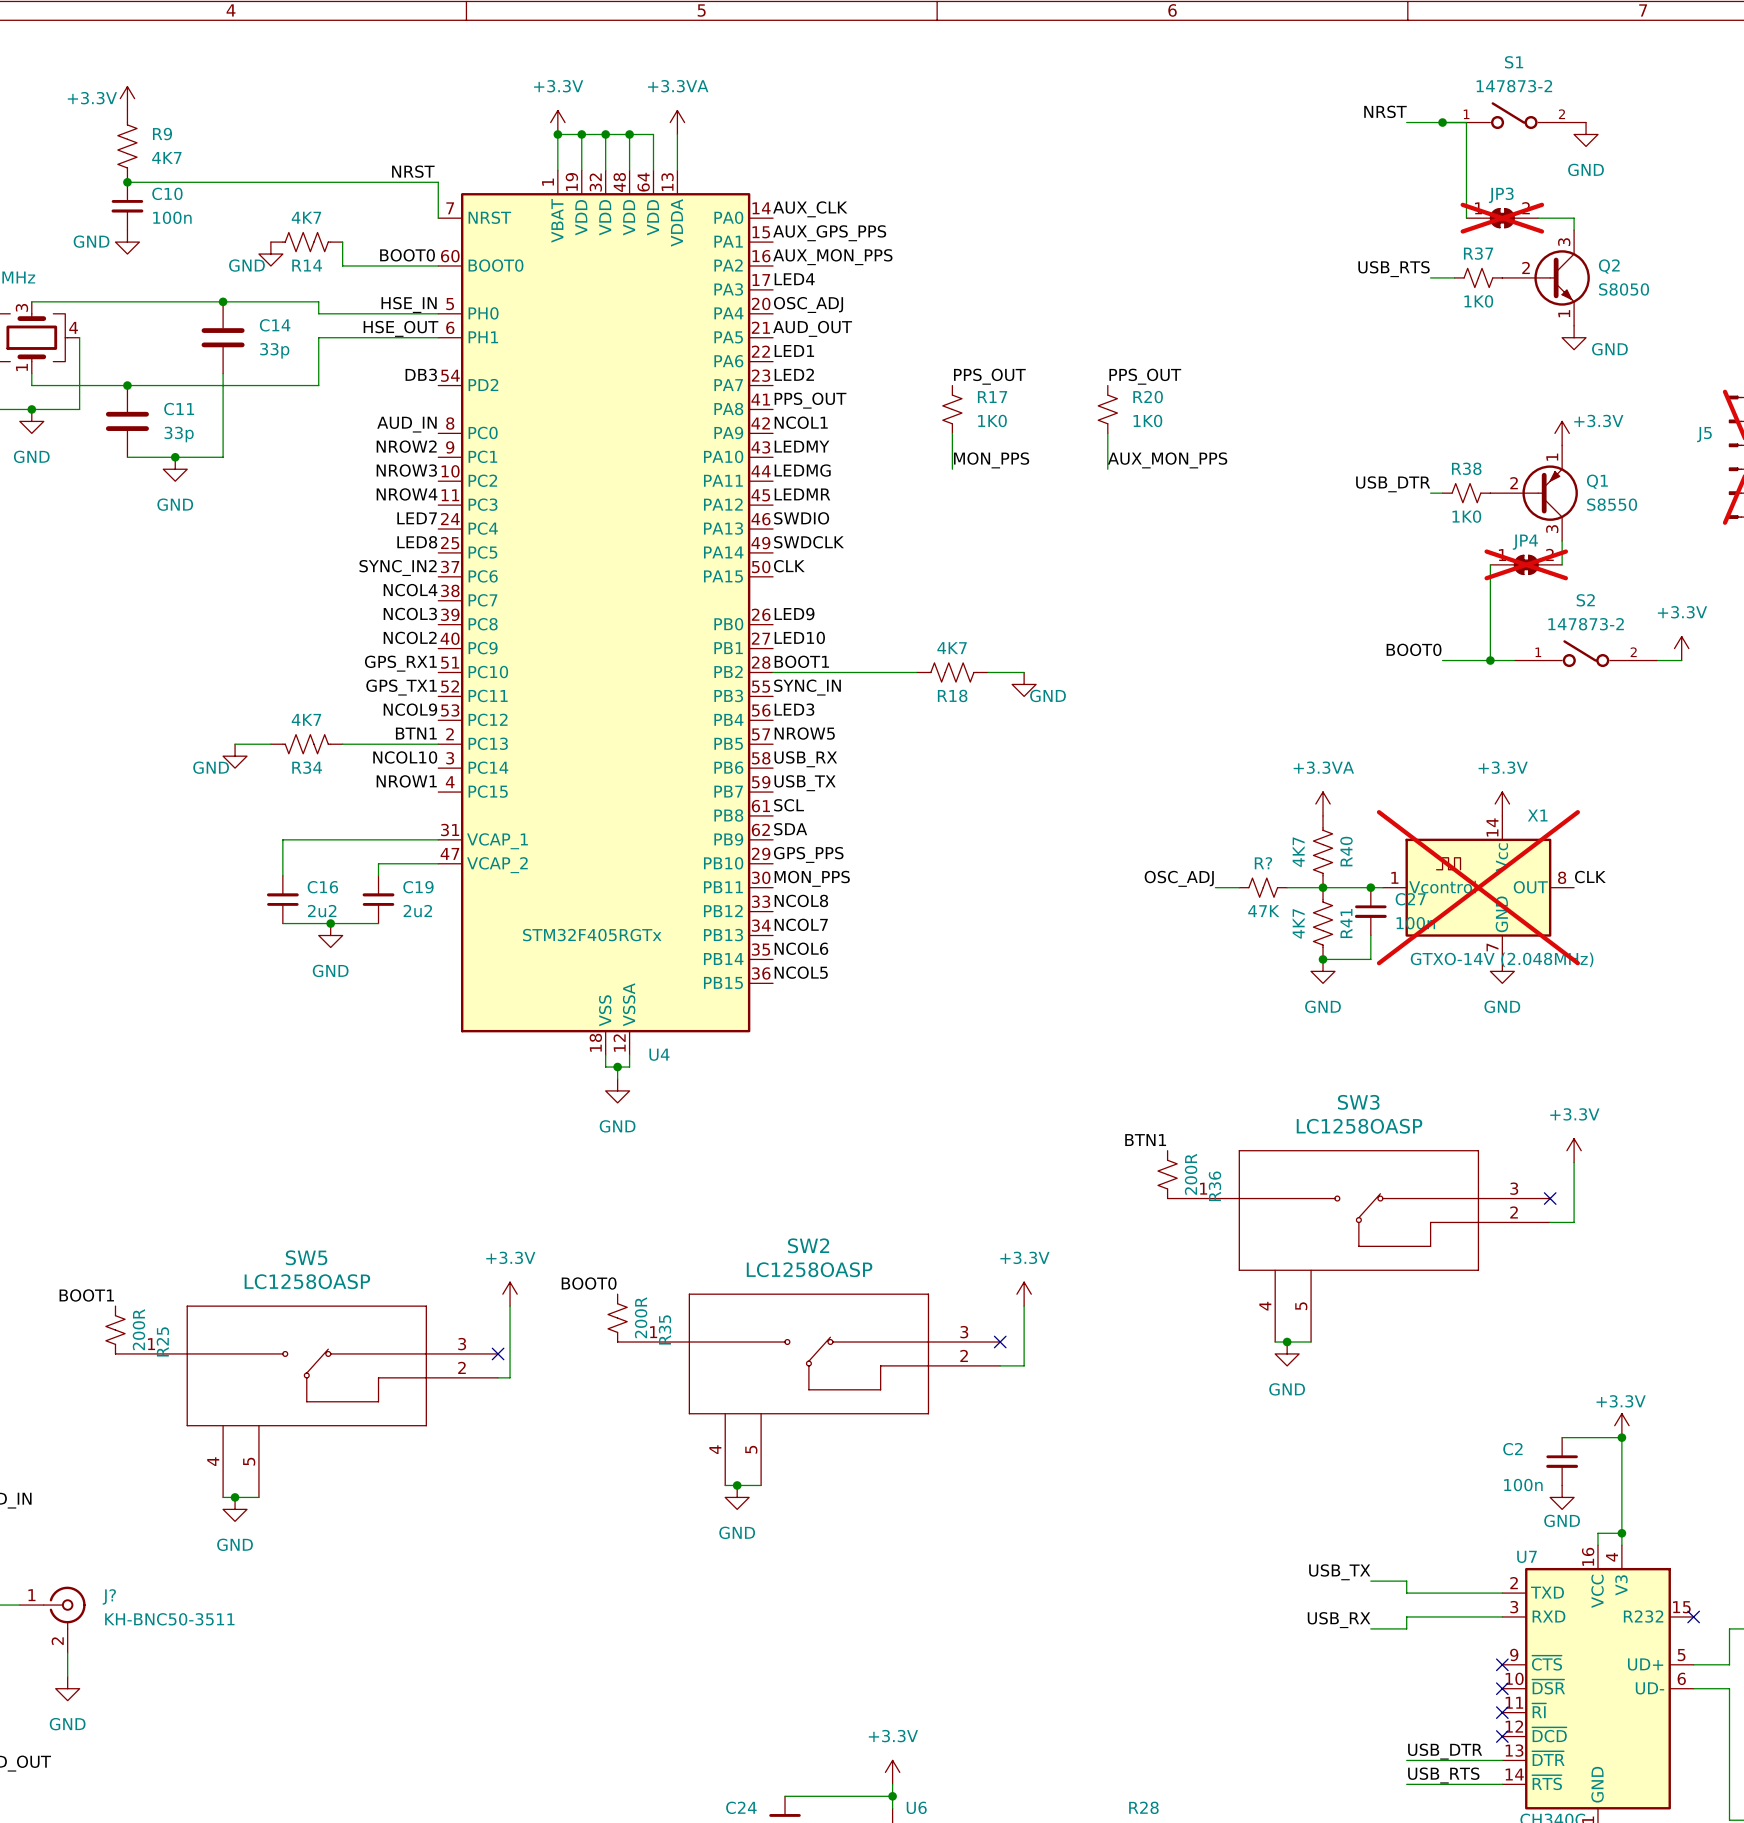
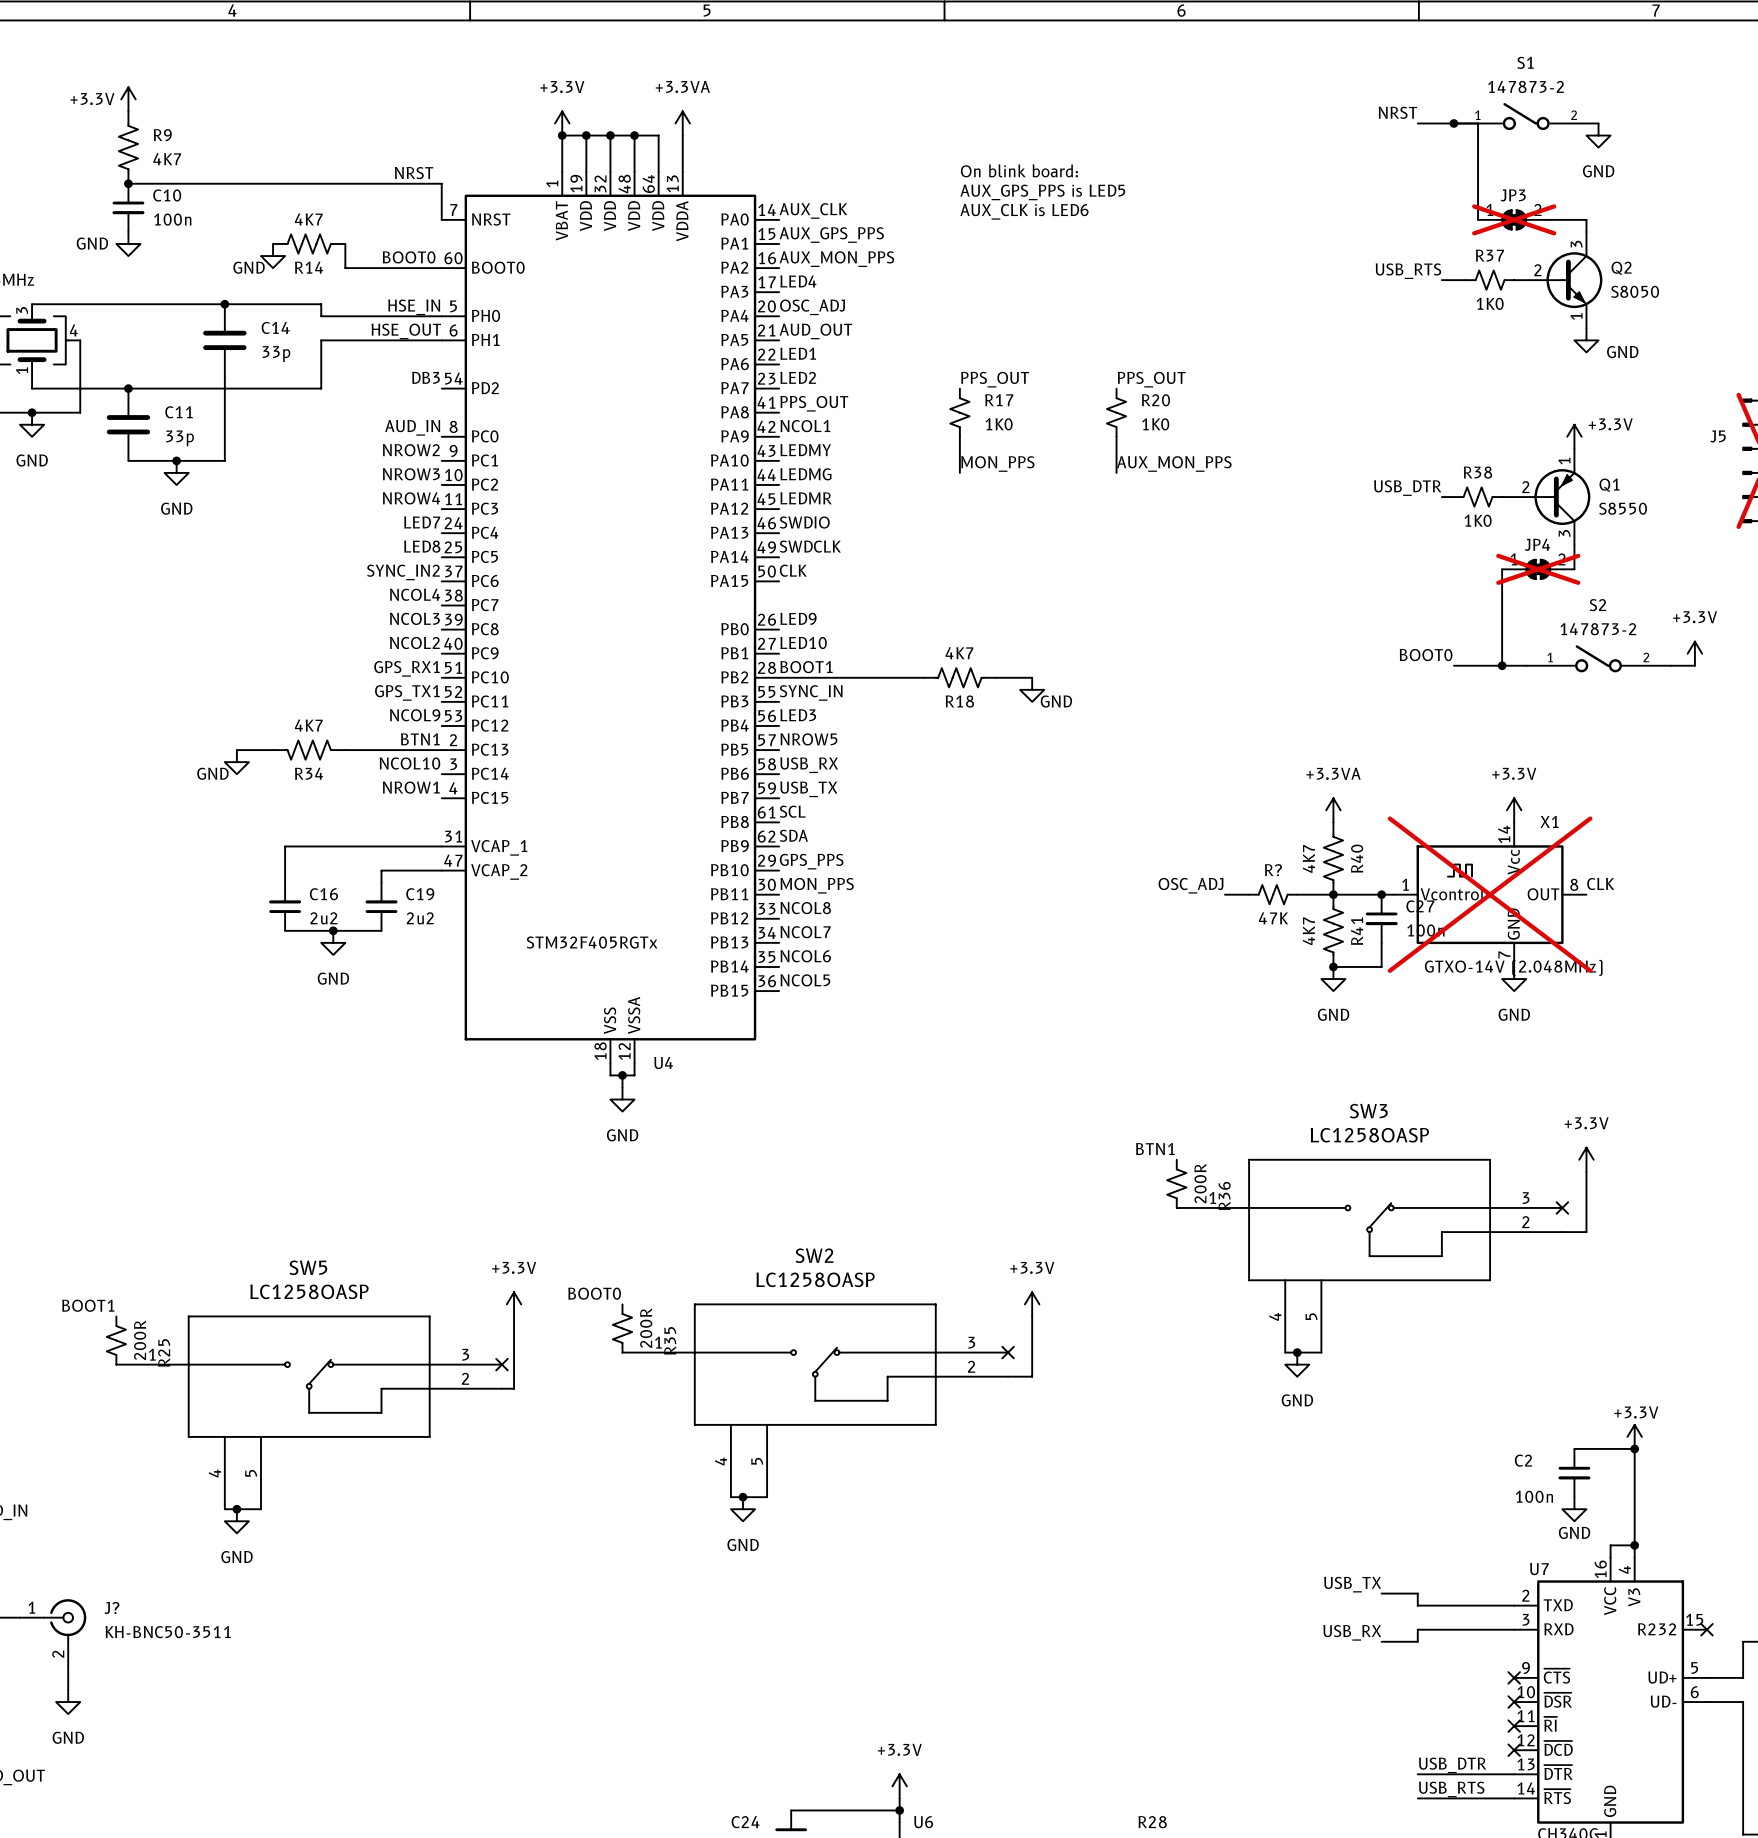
text: none -> On blink board: (1019, 170)
text: none -> AUX_GPS_PPS is LED5 (1042, 192)
text: none -> AUX_CLK is LED6 (1024, 211)

